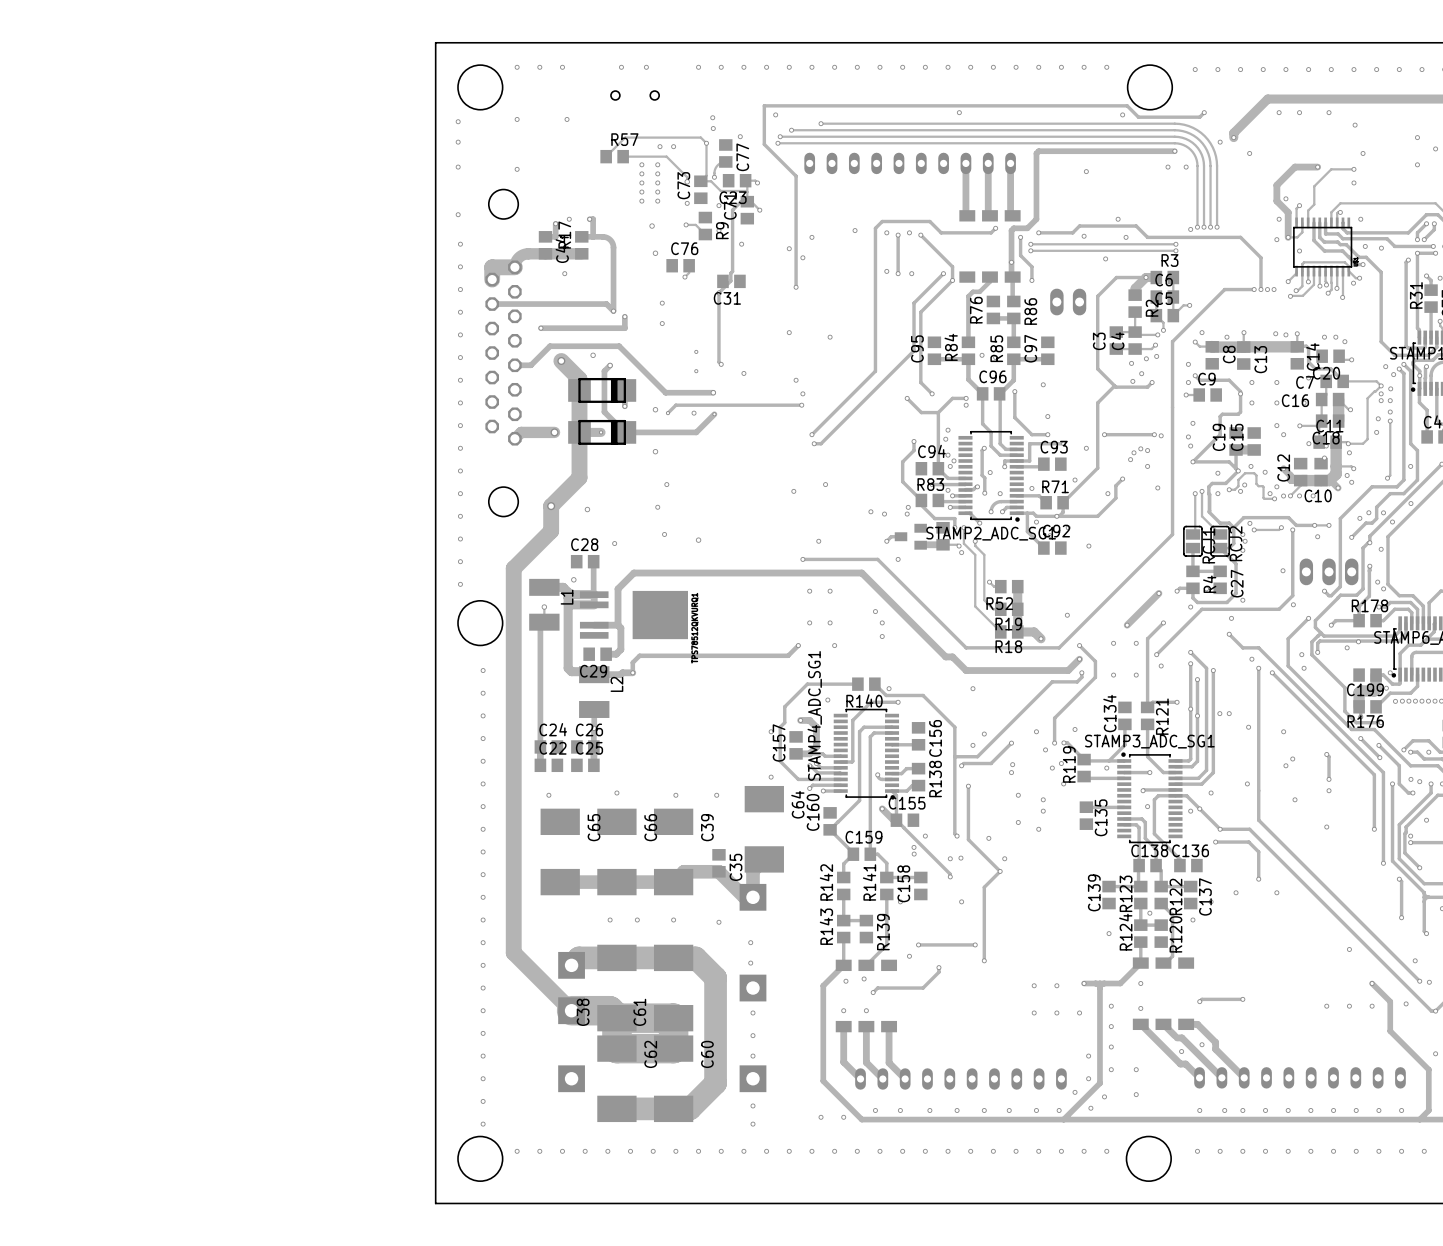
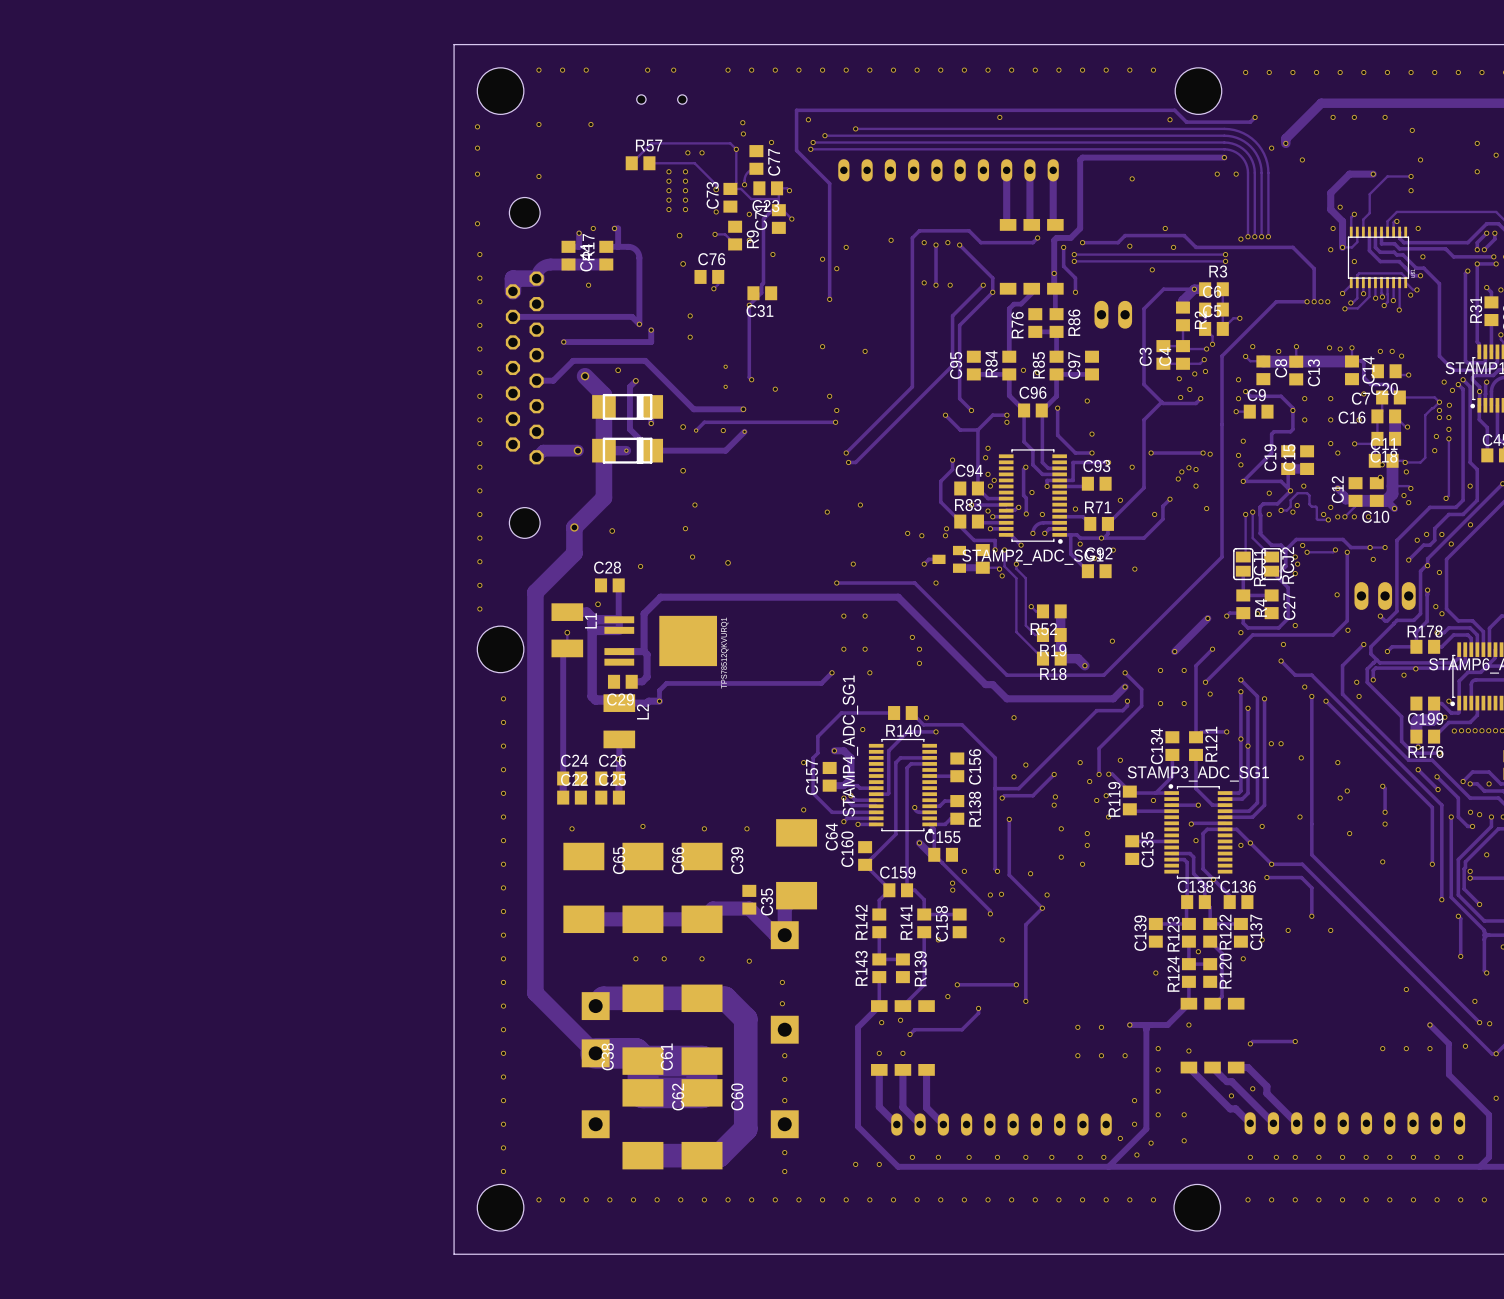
via: (1381, 248) -> none
via: (1308, 443) -> none
via: (1265, 472) -> none

